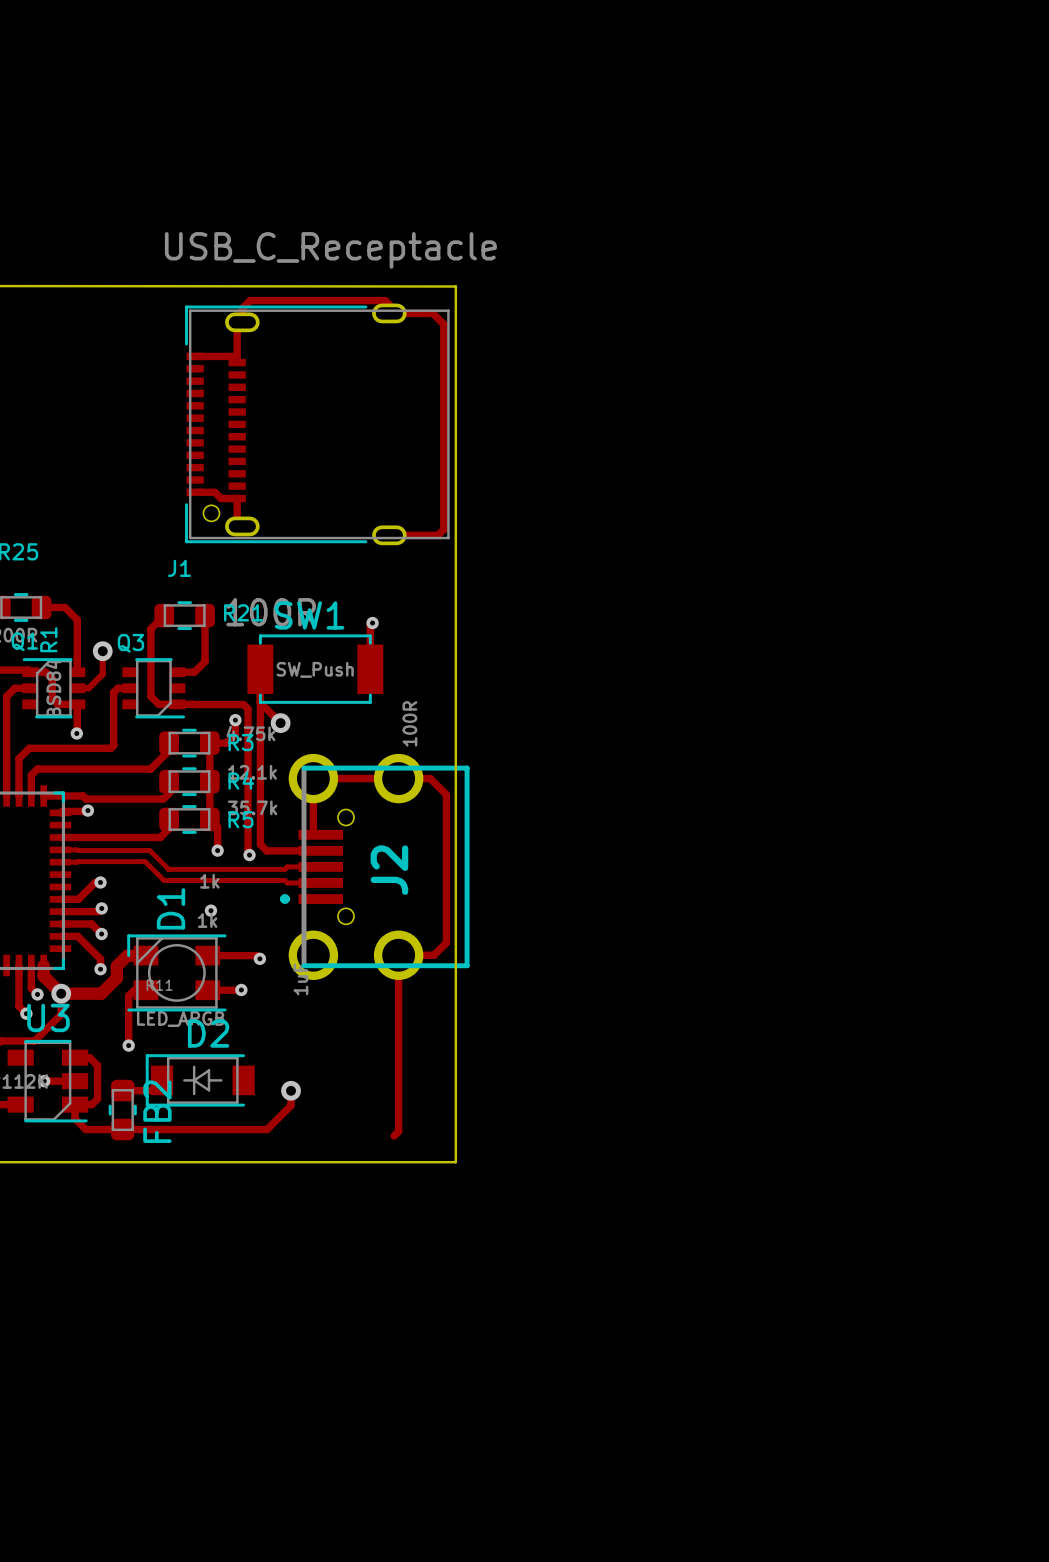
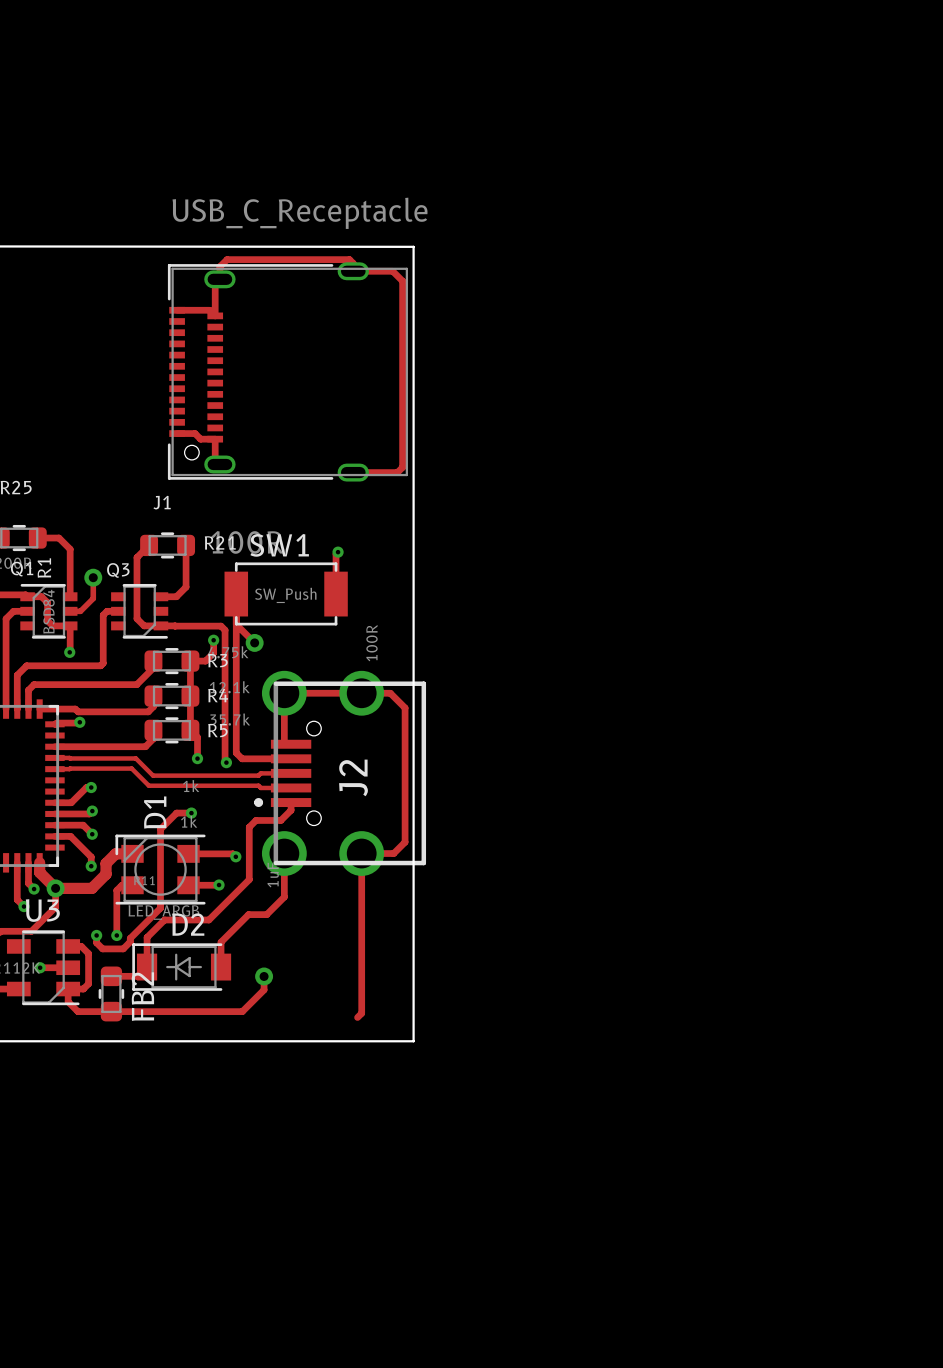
track: none -> (291, 802) (291, 810) (280, 820) (256, 820) (249, 827) (249, 879) (208, 920) (164, 920) (147, 937) (147, 967)
track: none -> (191, 813) (176, 813) (160, 829) (160, 908) (130, 938) (130, 941) (123, 948) (102, 948) (96, 942) (96, 935)
track: none -> (284, 853) (284, 897) (266, 914) (248, 914) (221, 942) (221, 967)
via: none -> (96, 935)

